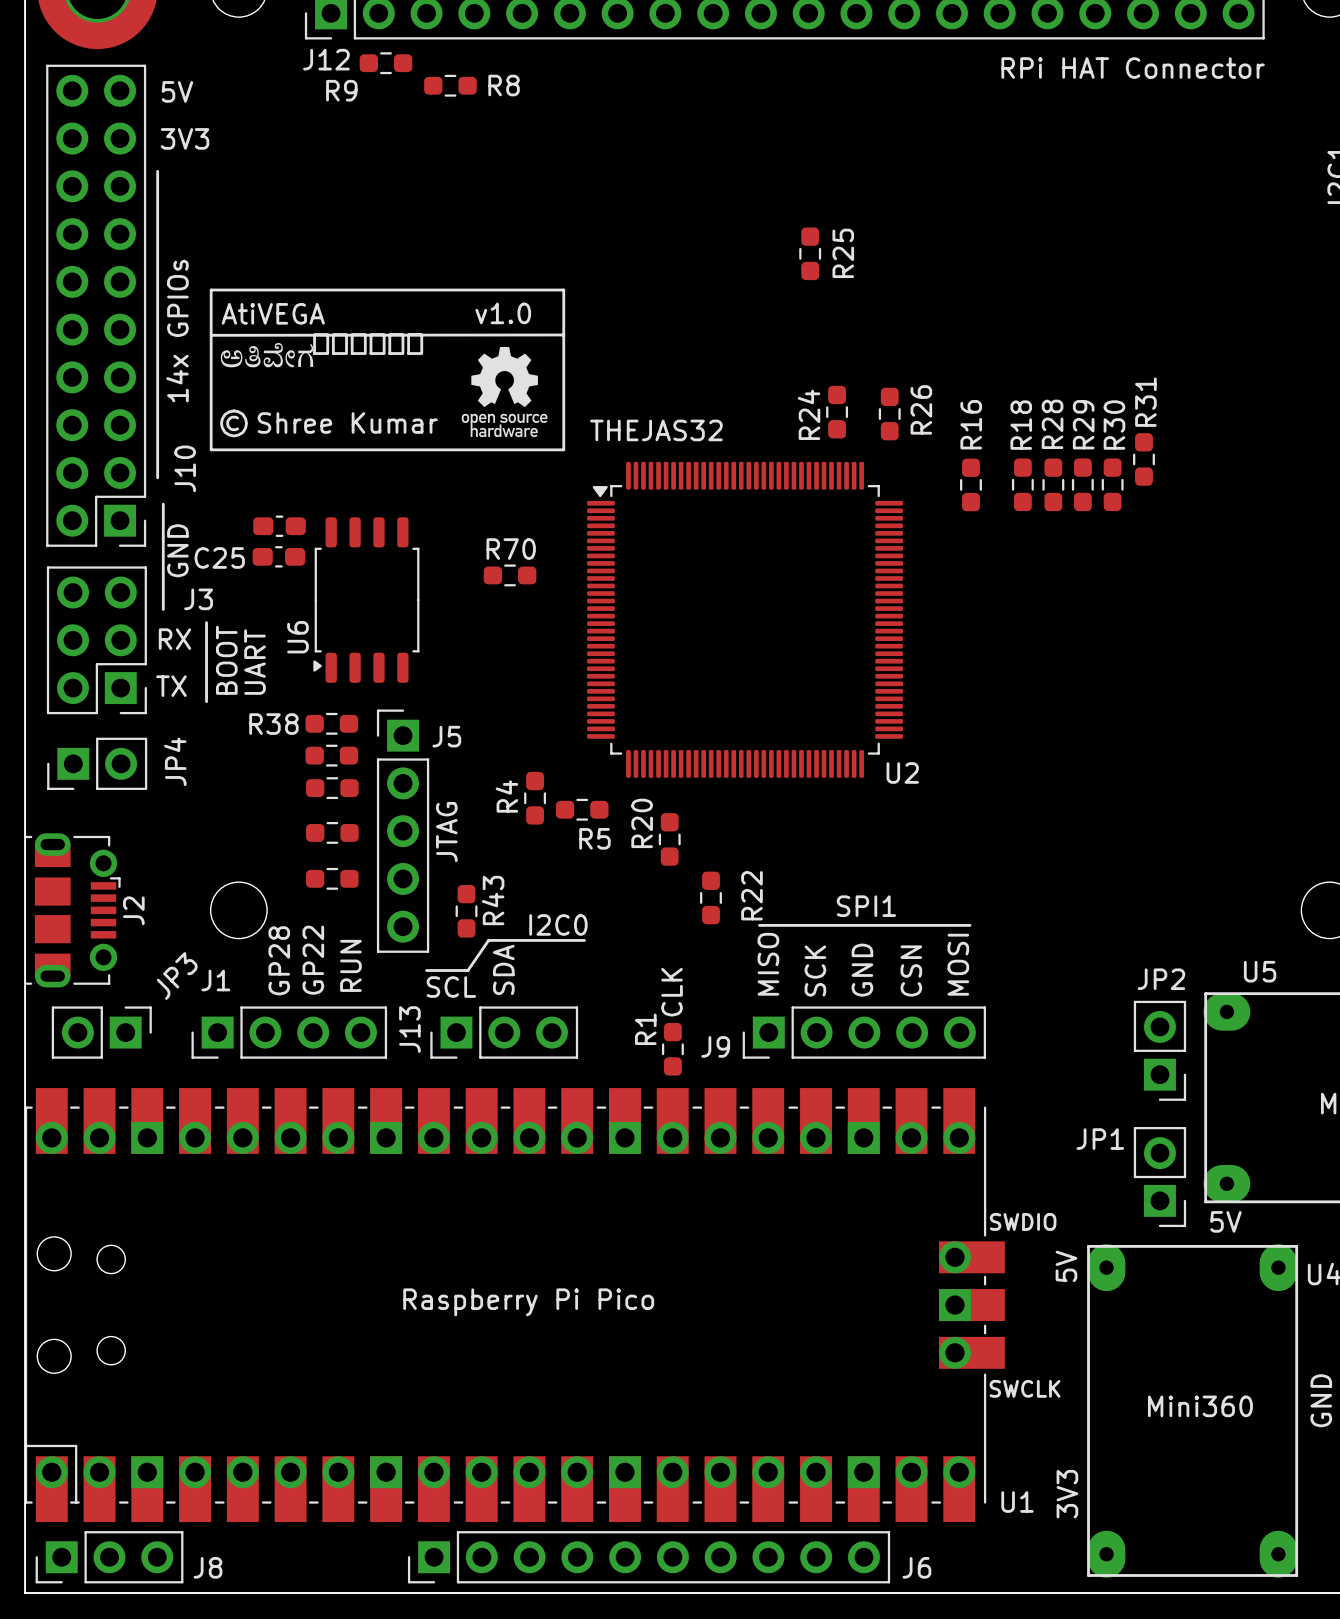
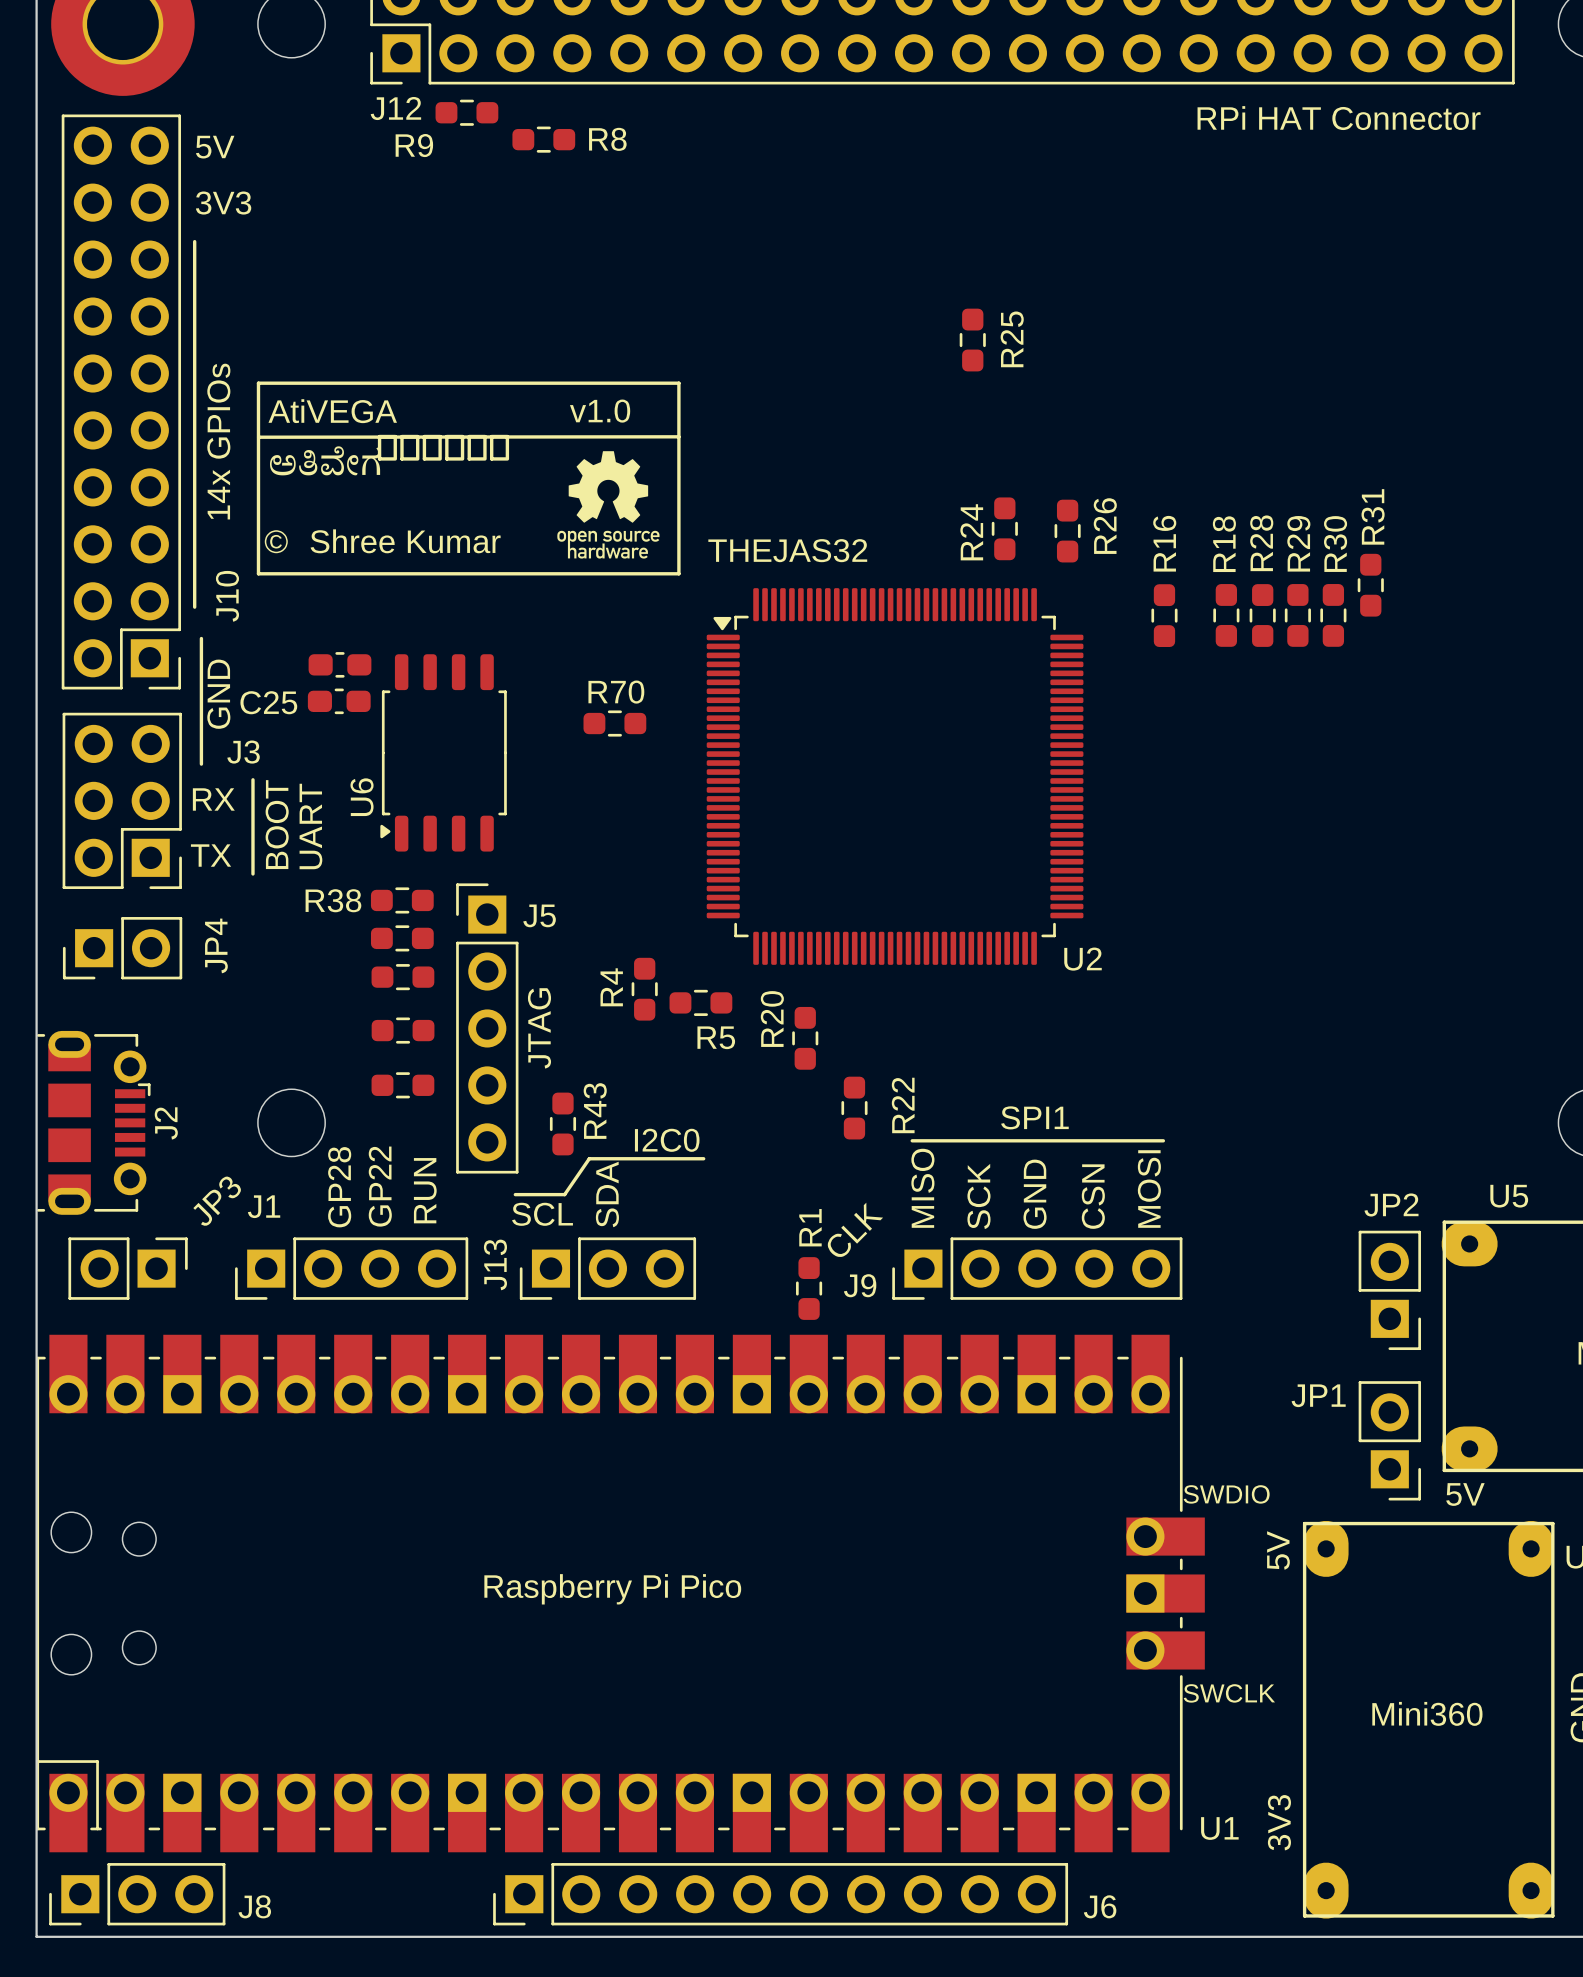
text rotation: 0° (672, 992) -> 45° clockwise (855, 1230)
R1 name position: R1 (645, 1029) -> R1 (810, 1227)

